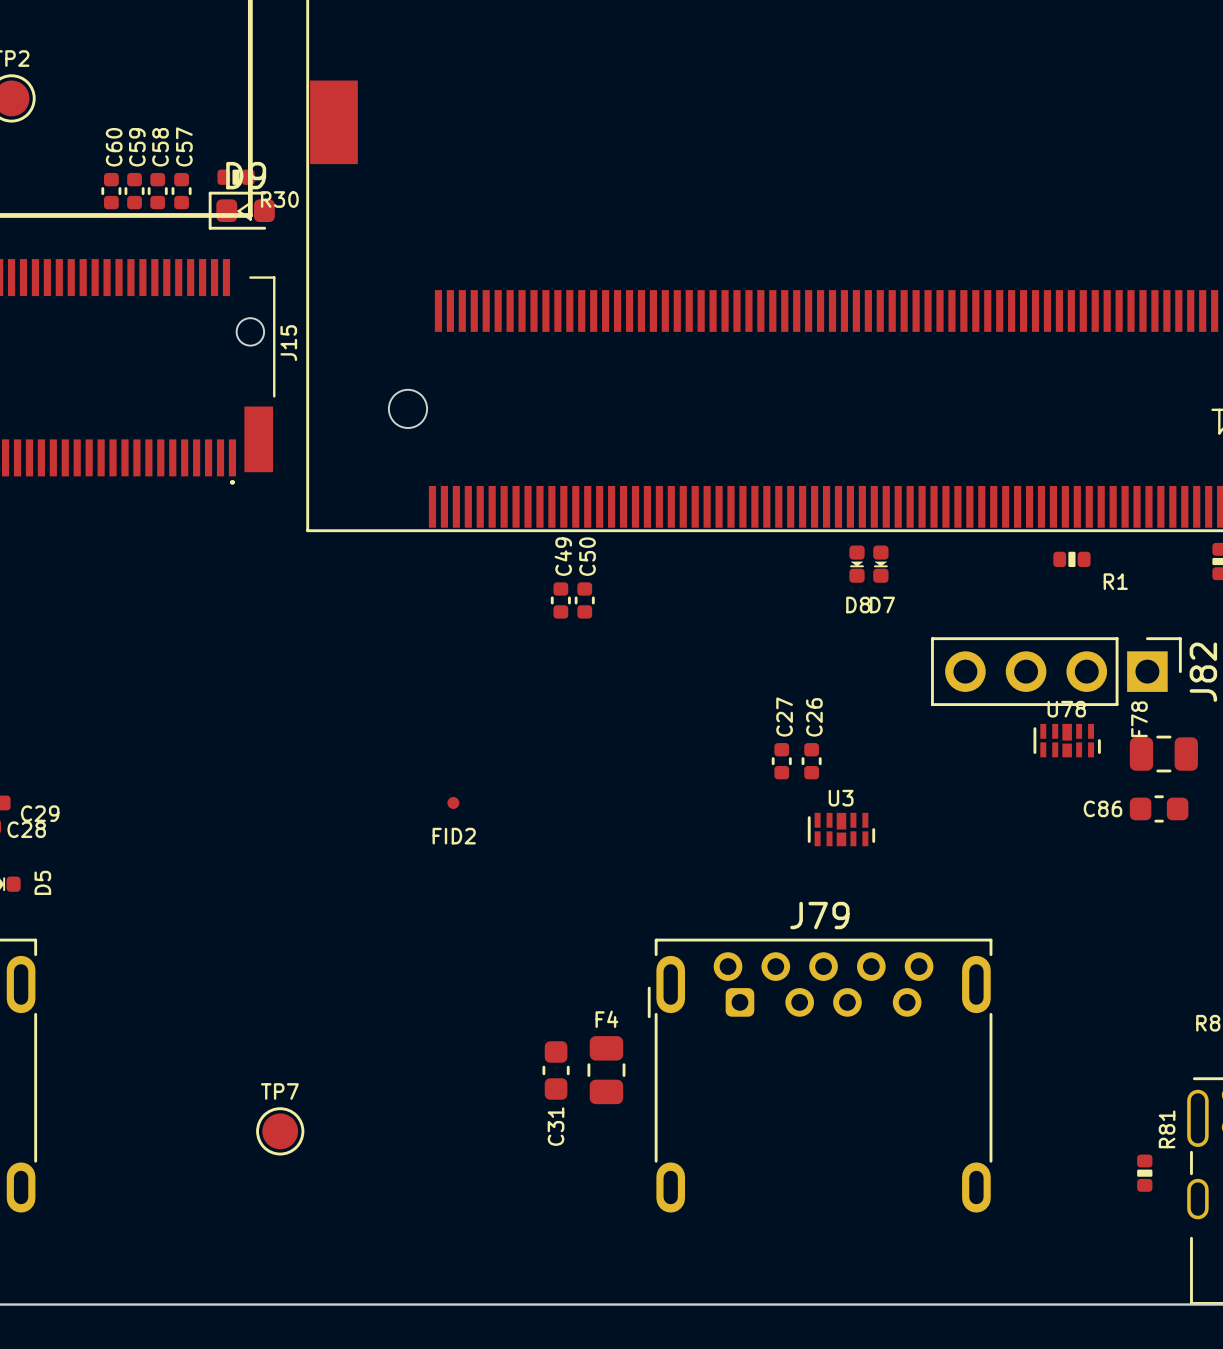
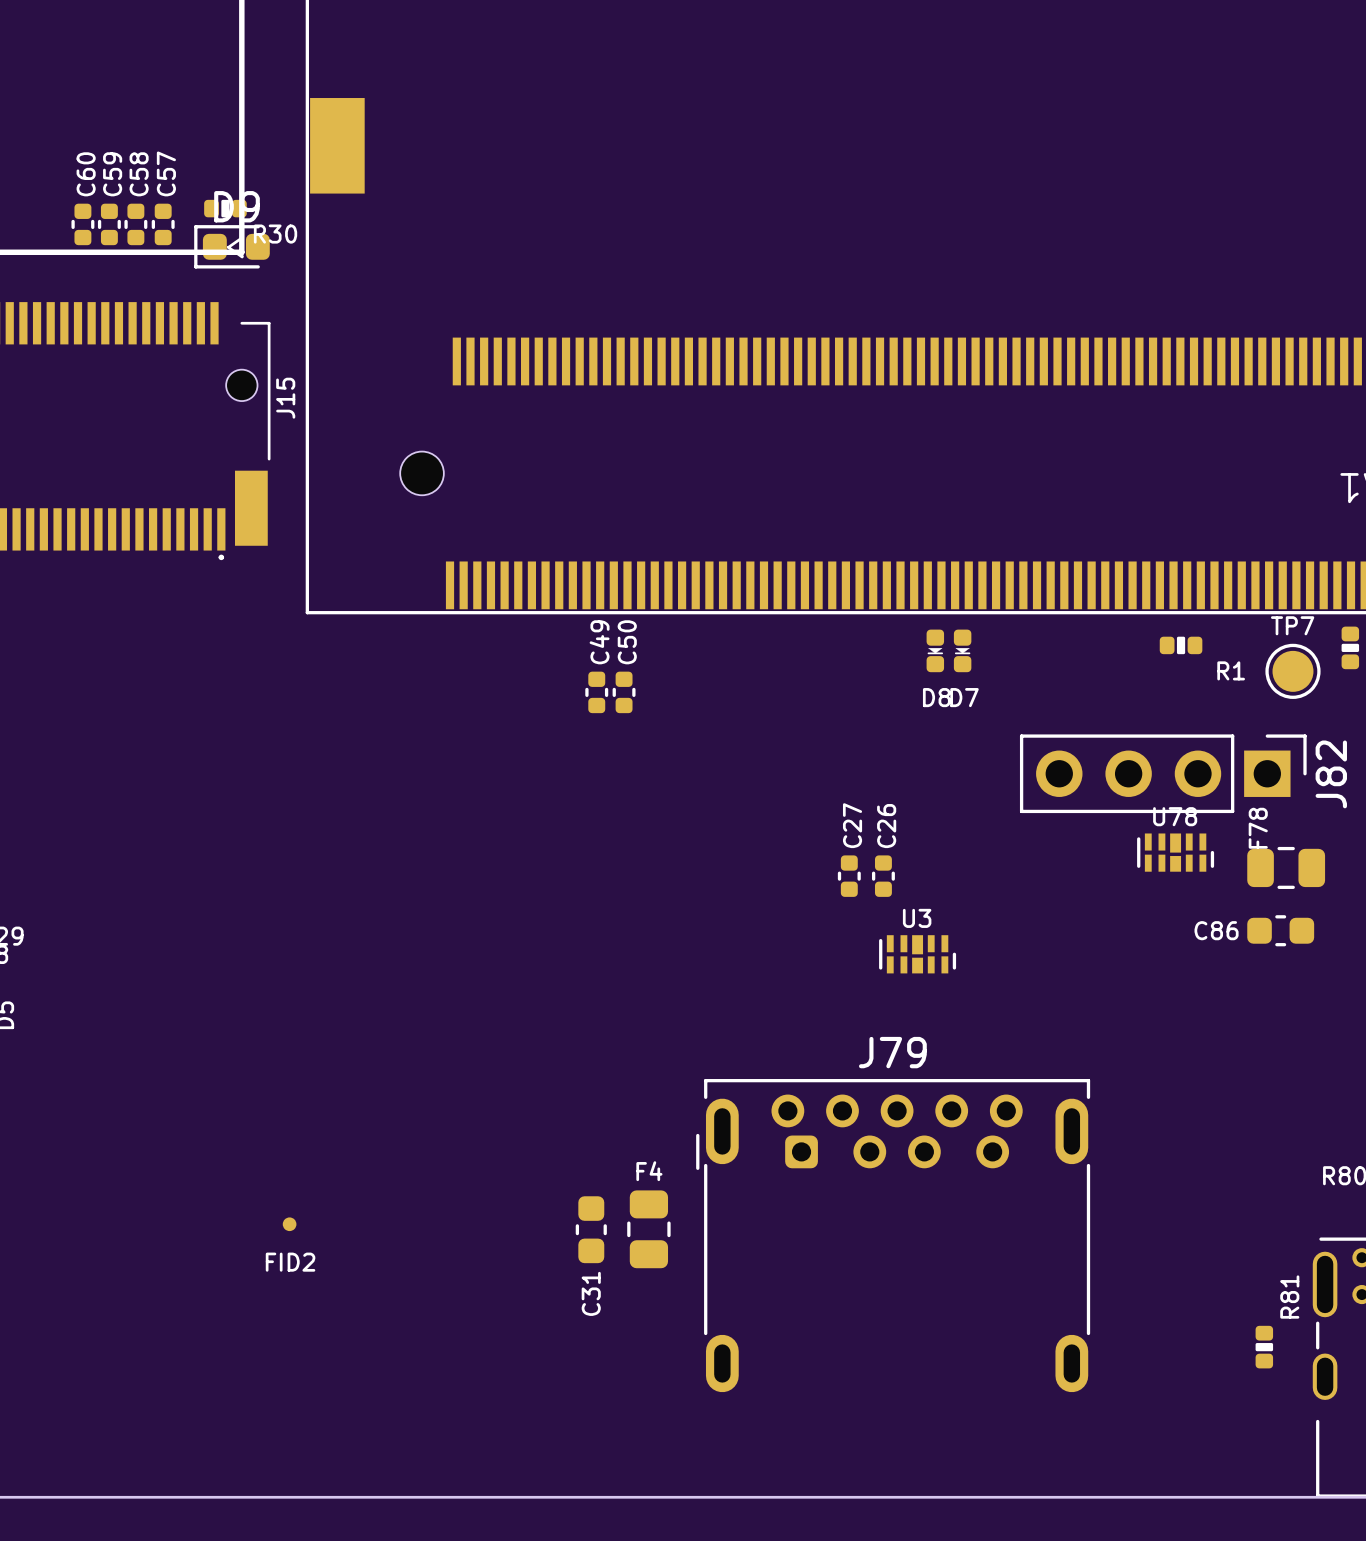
FID2 position: (453, 802) -> (289, 1224)
TP7 position: (280, 1131) -> (1292, 671)

